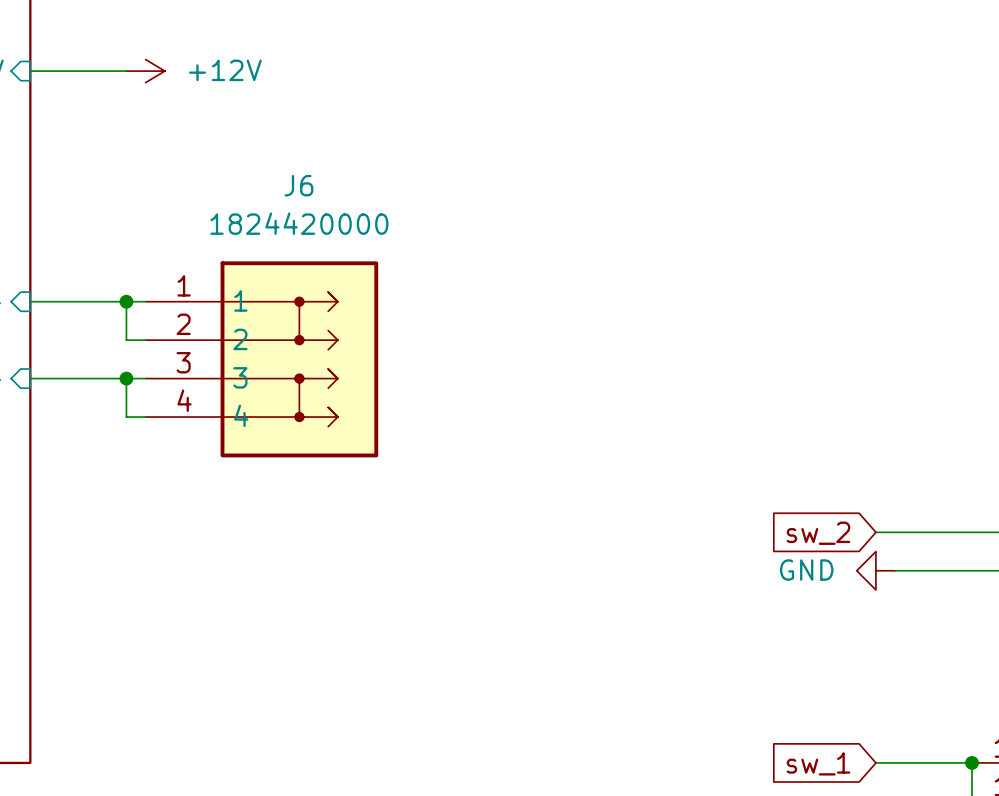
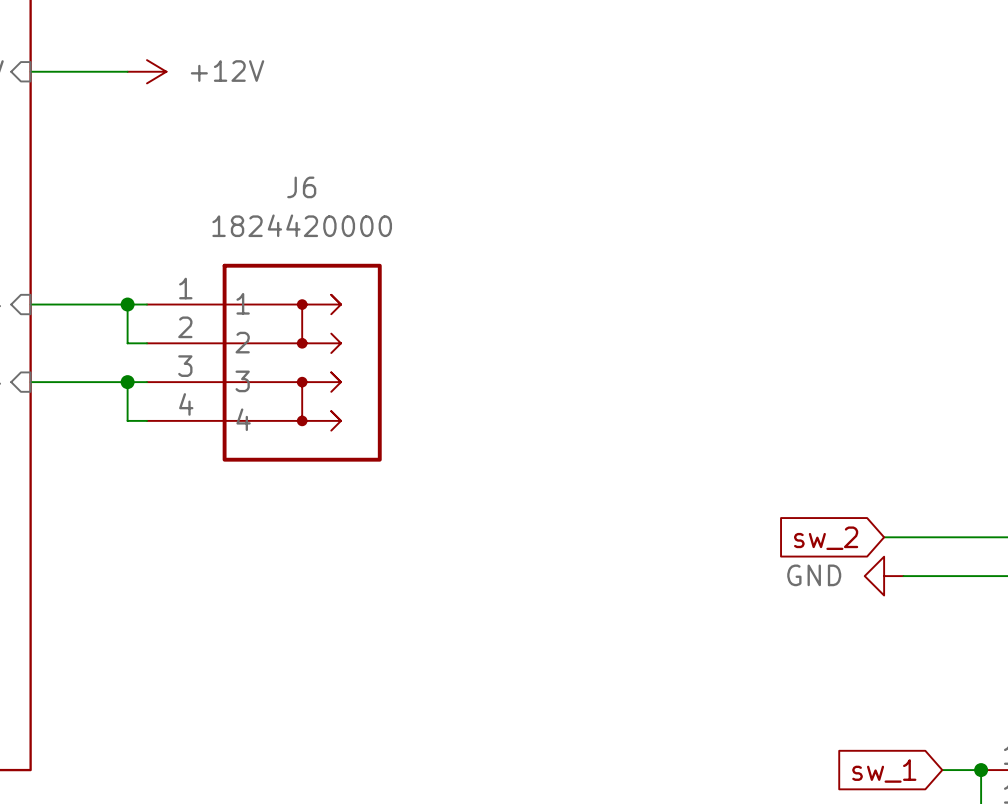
wire: (875, 762) (933, 762) -> none
global label position: sw_1 (818, 763) -> sw_1 (884, 770)

